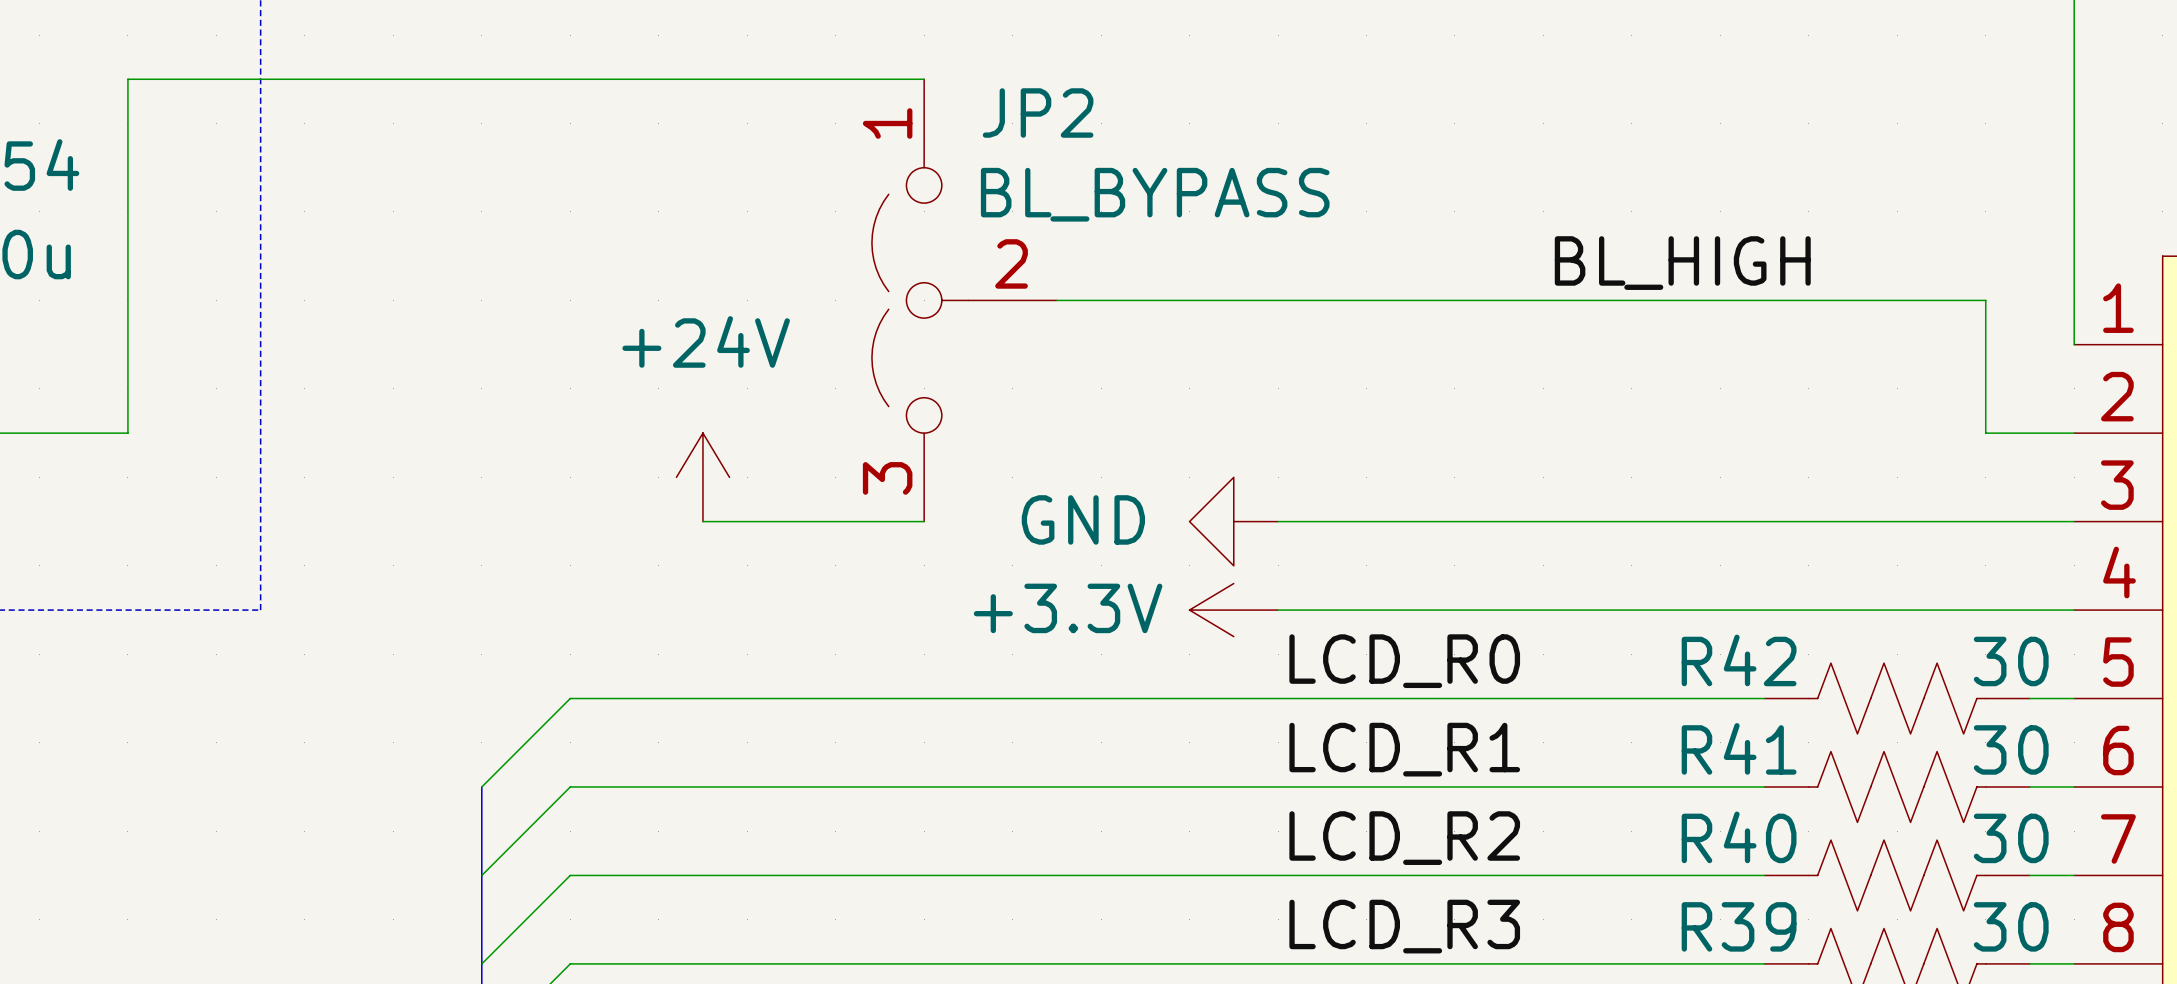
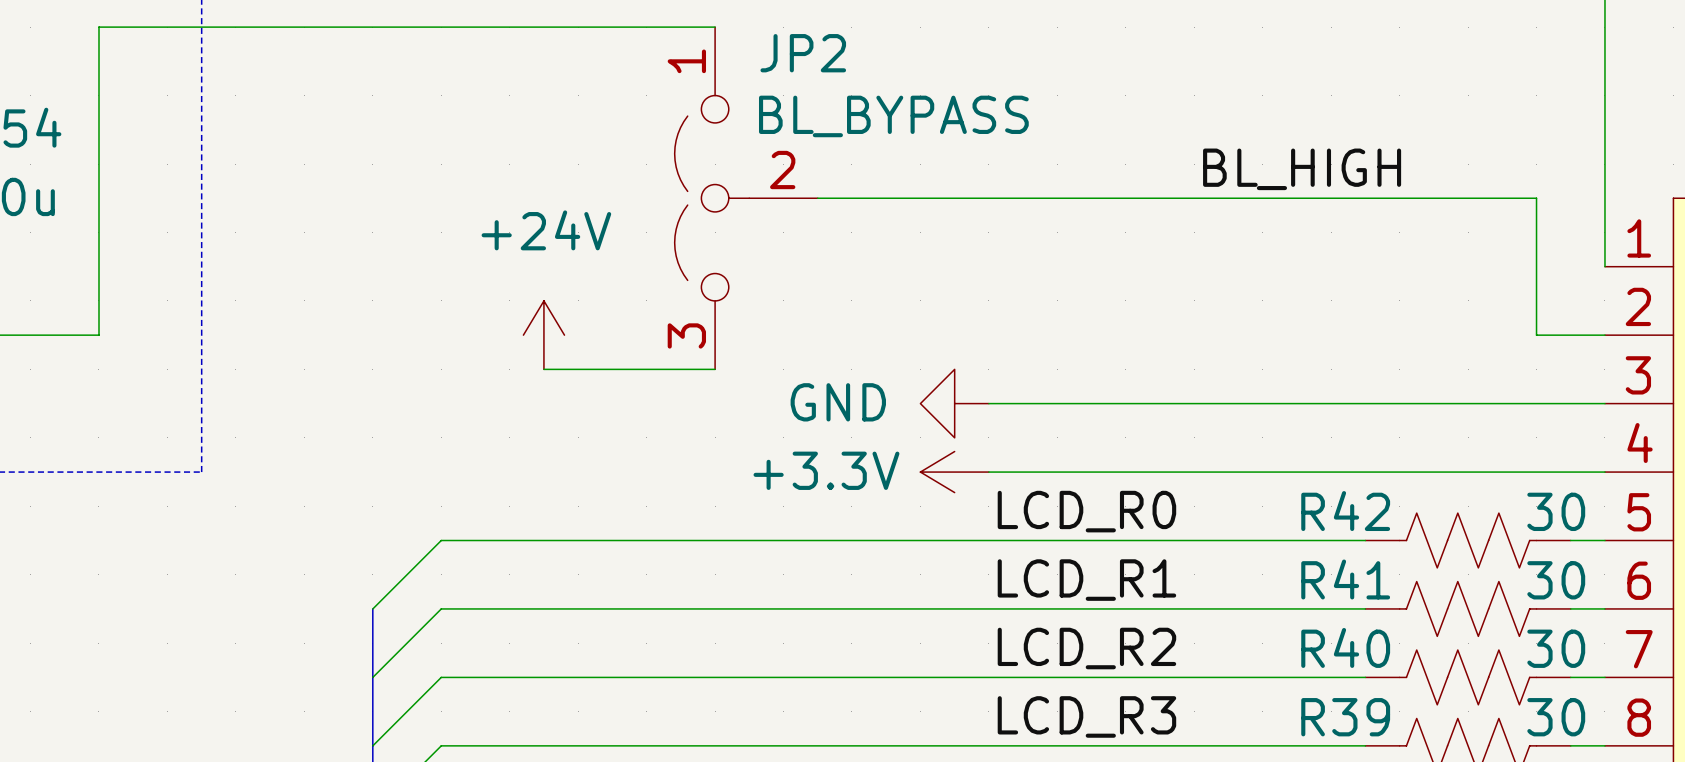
wire: (127, 79) (924, 79) -> (98, 61) (98, 27) (715, 27)
label position: BL_HIGH (1682, 263) -> BL_HIGH (1302, 169)
JP2 position: (964, 300) -> (746, 198)
wire: (1056, 300) (1985, 300) -> (817, 198) (1536, 198) (1536, 232)
power symbol position: +24V (702, 477) -> +24V (543, 335)
wire: (702, 521) (924, 521) -> (543, 369) (715, 369)

